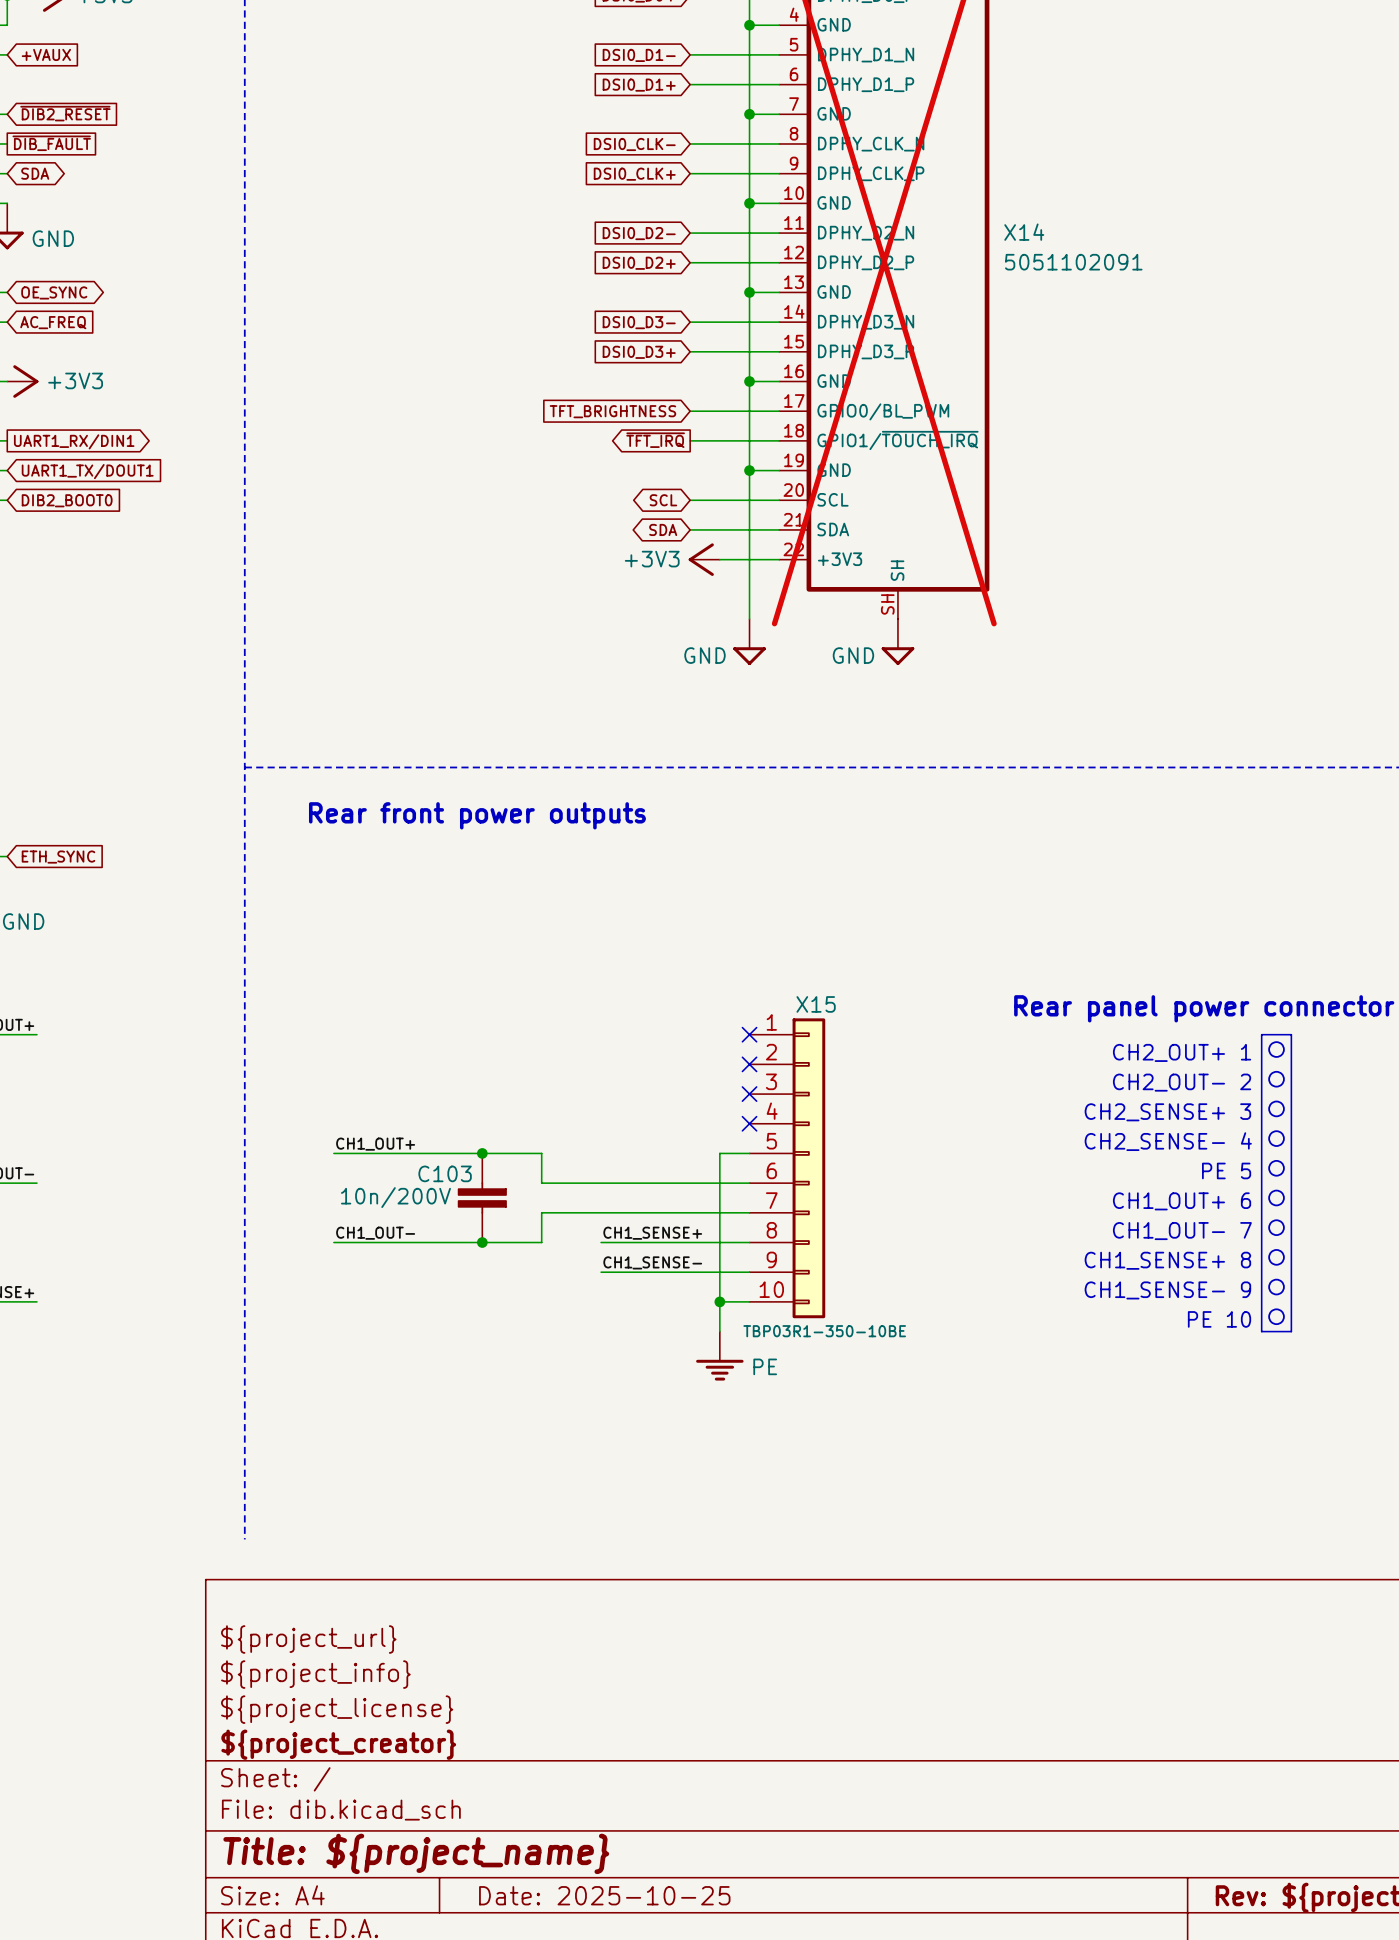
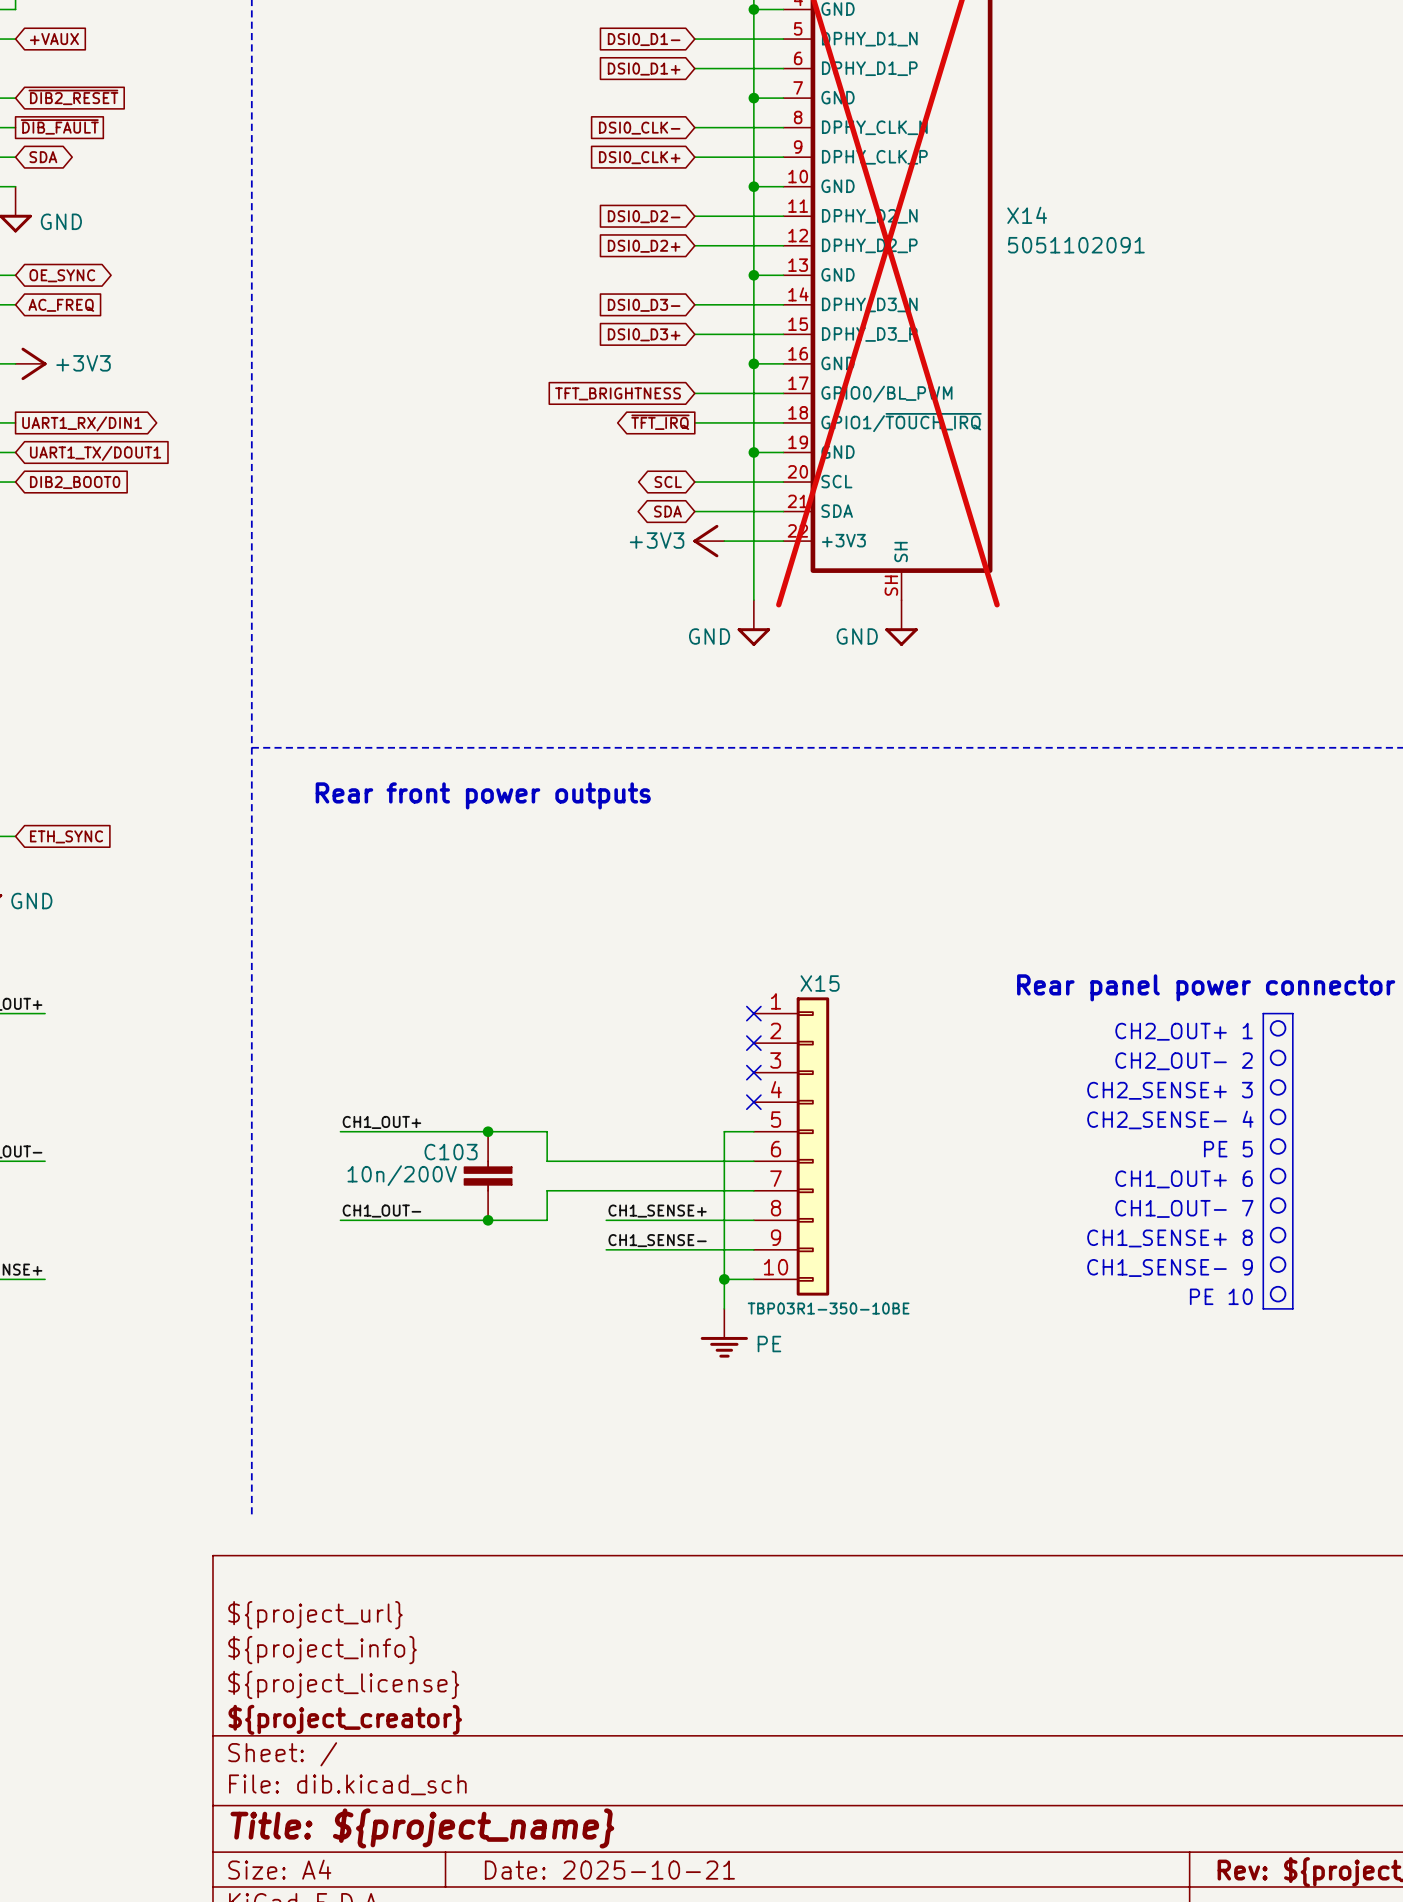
title block: Date: 2025-10-25 (604, 1895) -> Date: 2025-10-21 (609, 1870)

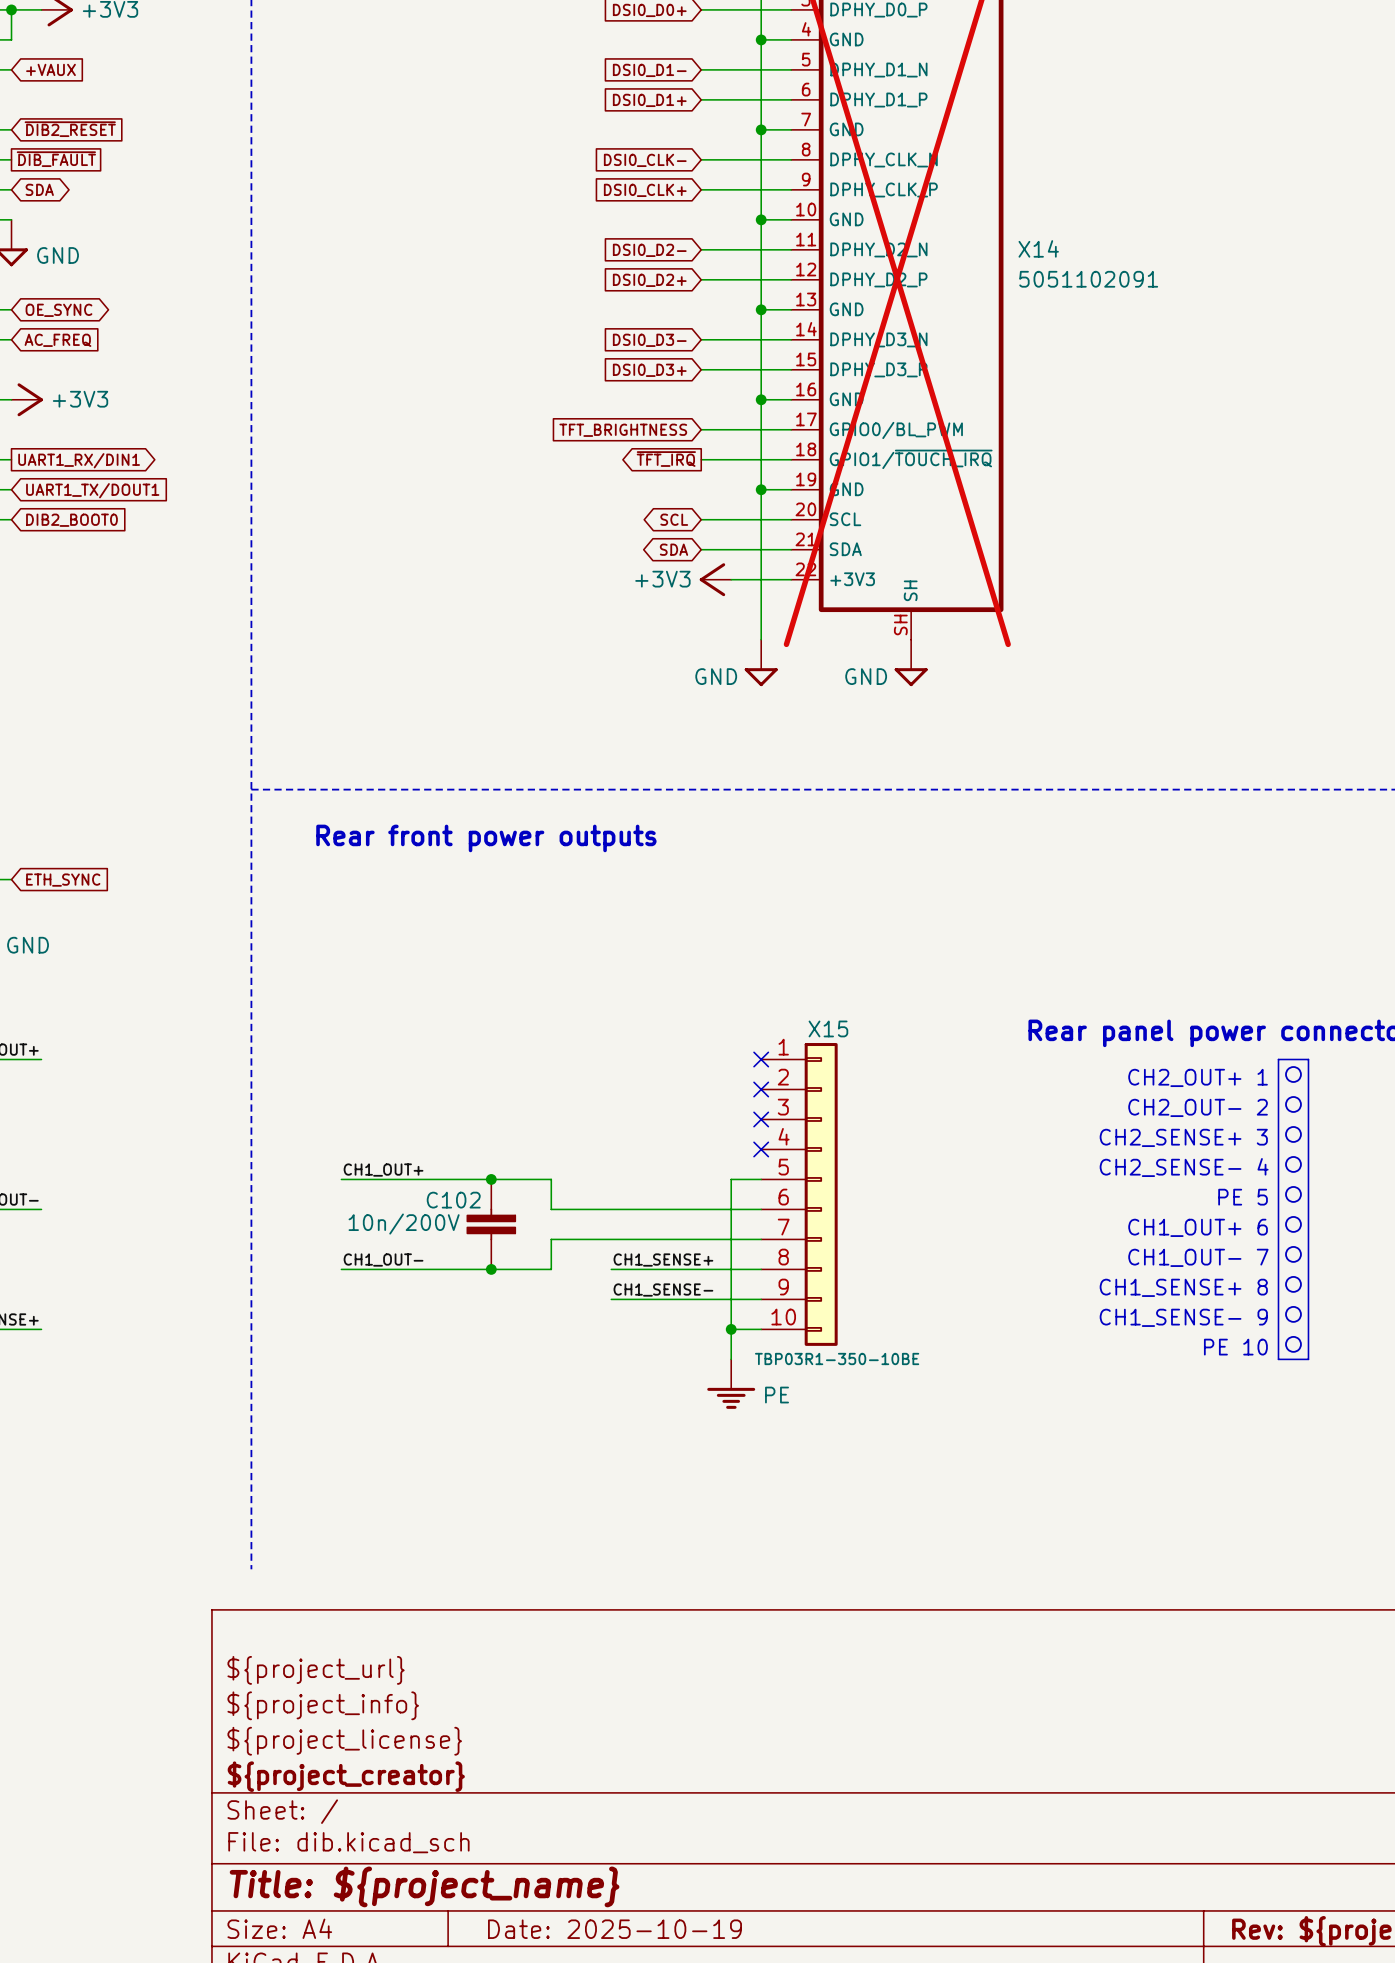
C103 name: C103 (451, 1152) -> C102 (453, 1200)
title block: Date: 2025-10-21 (609, 1870) -> Date: 2025-10-19 (614, 1929)

